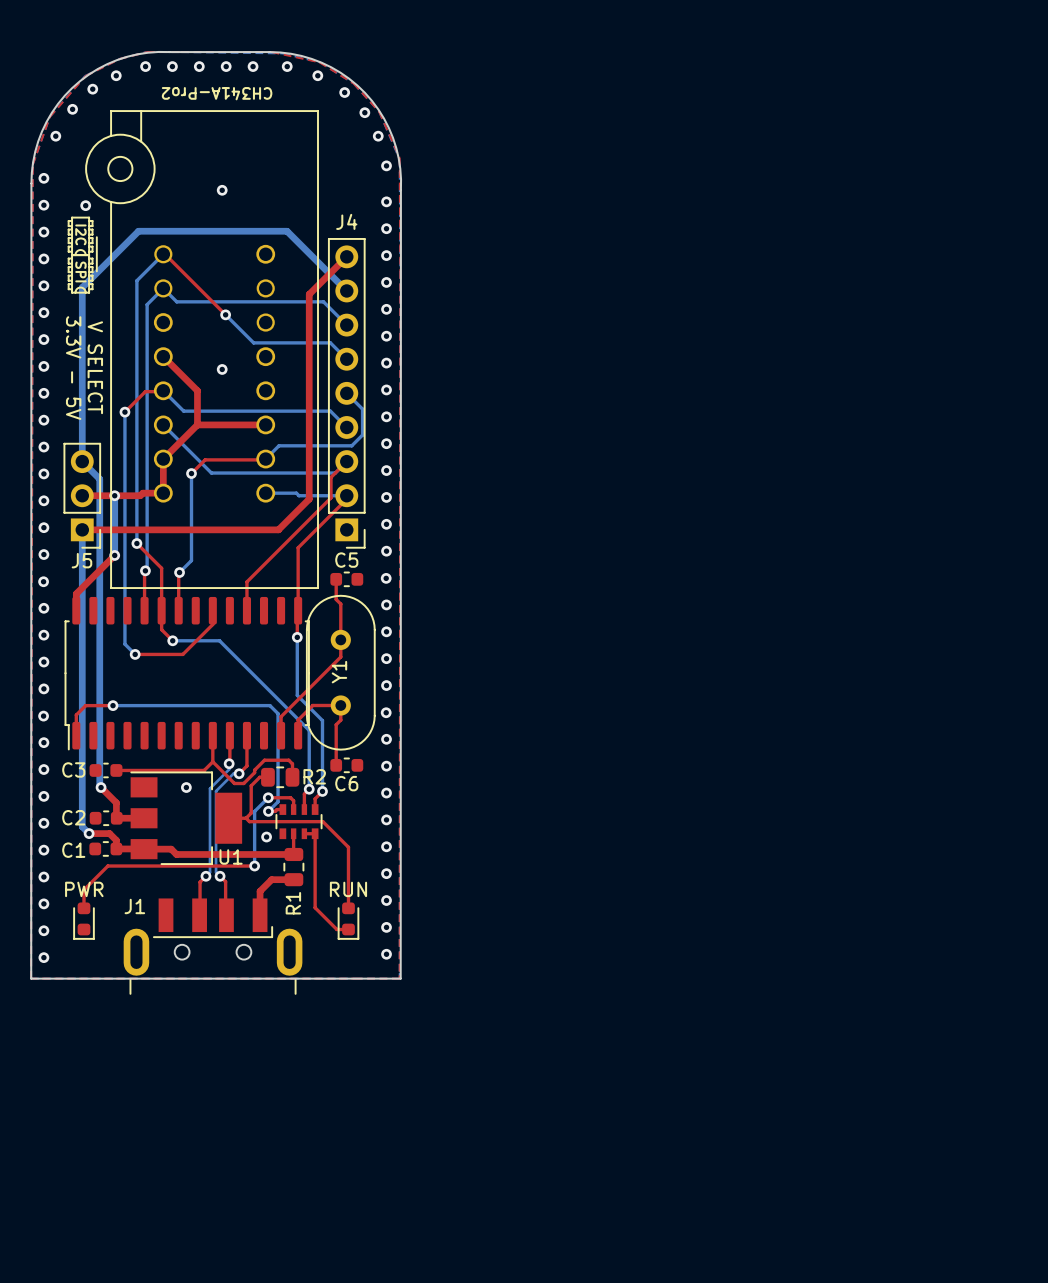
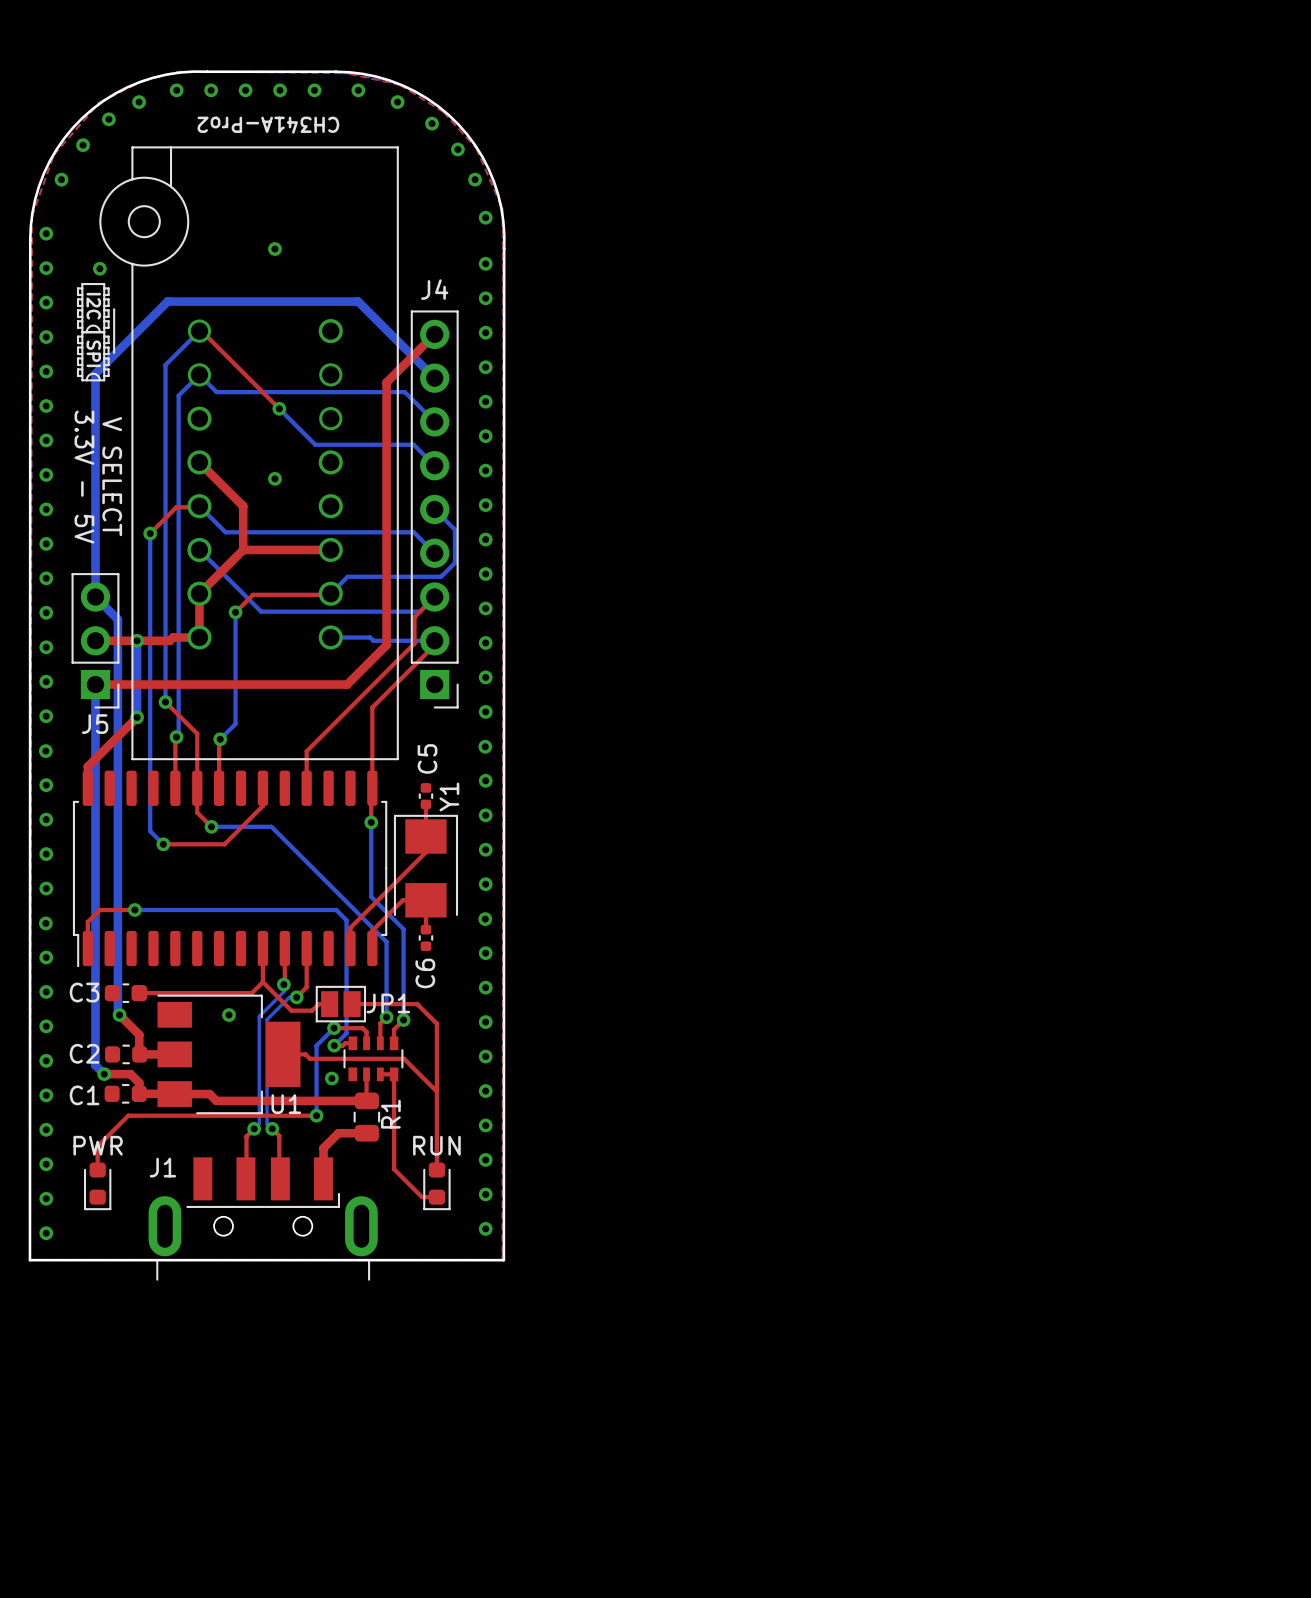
C5 footprint: [330, 571, 364, 588] -> [418, 783, 434, 810]
top track: (336, 579) (336, 599) (340, 604) (340, 656) (281, 716) (281, 719) -> (425, 804) (425, 852) (350, 927)
Y1 footprint: [306, 594, 376, 751] -> [393, 814, 459, 918]
Y1 name position: Y1 (339, 672) -> Y1 (449, 797)
top track: (298, 721) (312, 705) (340, 705) (340, 720) (336, 724) (336, 765) -> (372, 930) (402, 900) (425, 900) (425, 929)
C6 footprint: [330, 757, 364, 774] -> [418, 924, 434, 952]
top track: (267, 777) (259, 777) (251, 785) (251, 813) (246, 818) -> none
R2: (280, 777) -> none
top track: (292, 777) (292, 763) (288, 760) (264, 760) (243, 783) (234, 783) -> (329, 1004) (318, 1004) (312, 1010) (290, 1009)
JP1: none -> (340, 1004)
top track: none -> (352, 1004) (417, 1004) (436, 1023) (436, 1091)
R1 name position: R1 (293, 903) -> R1 (390, 1114)

